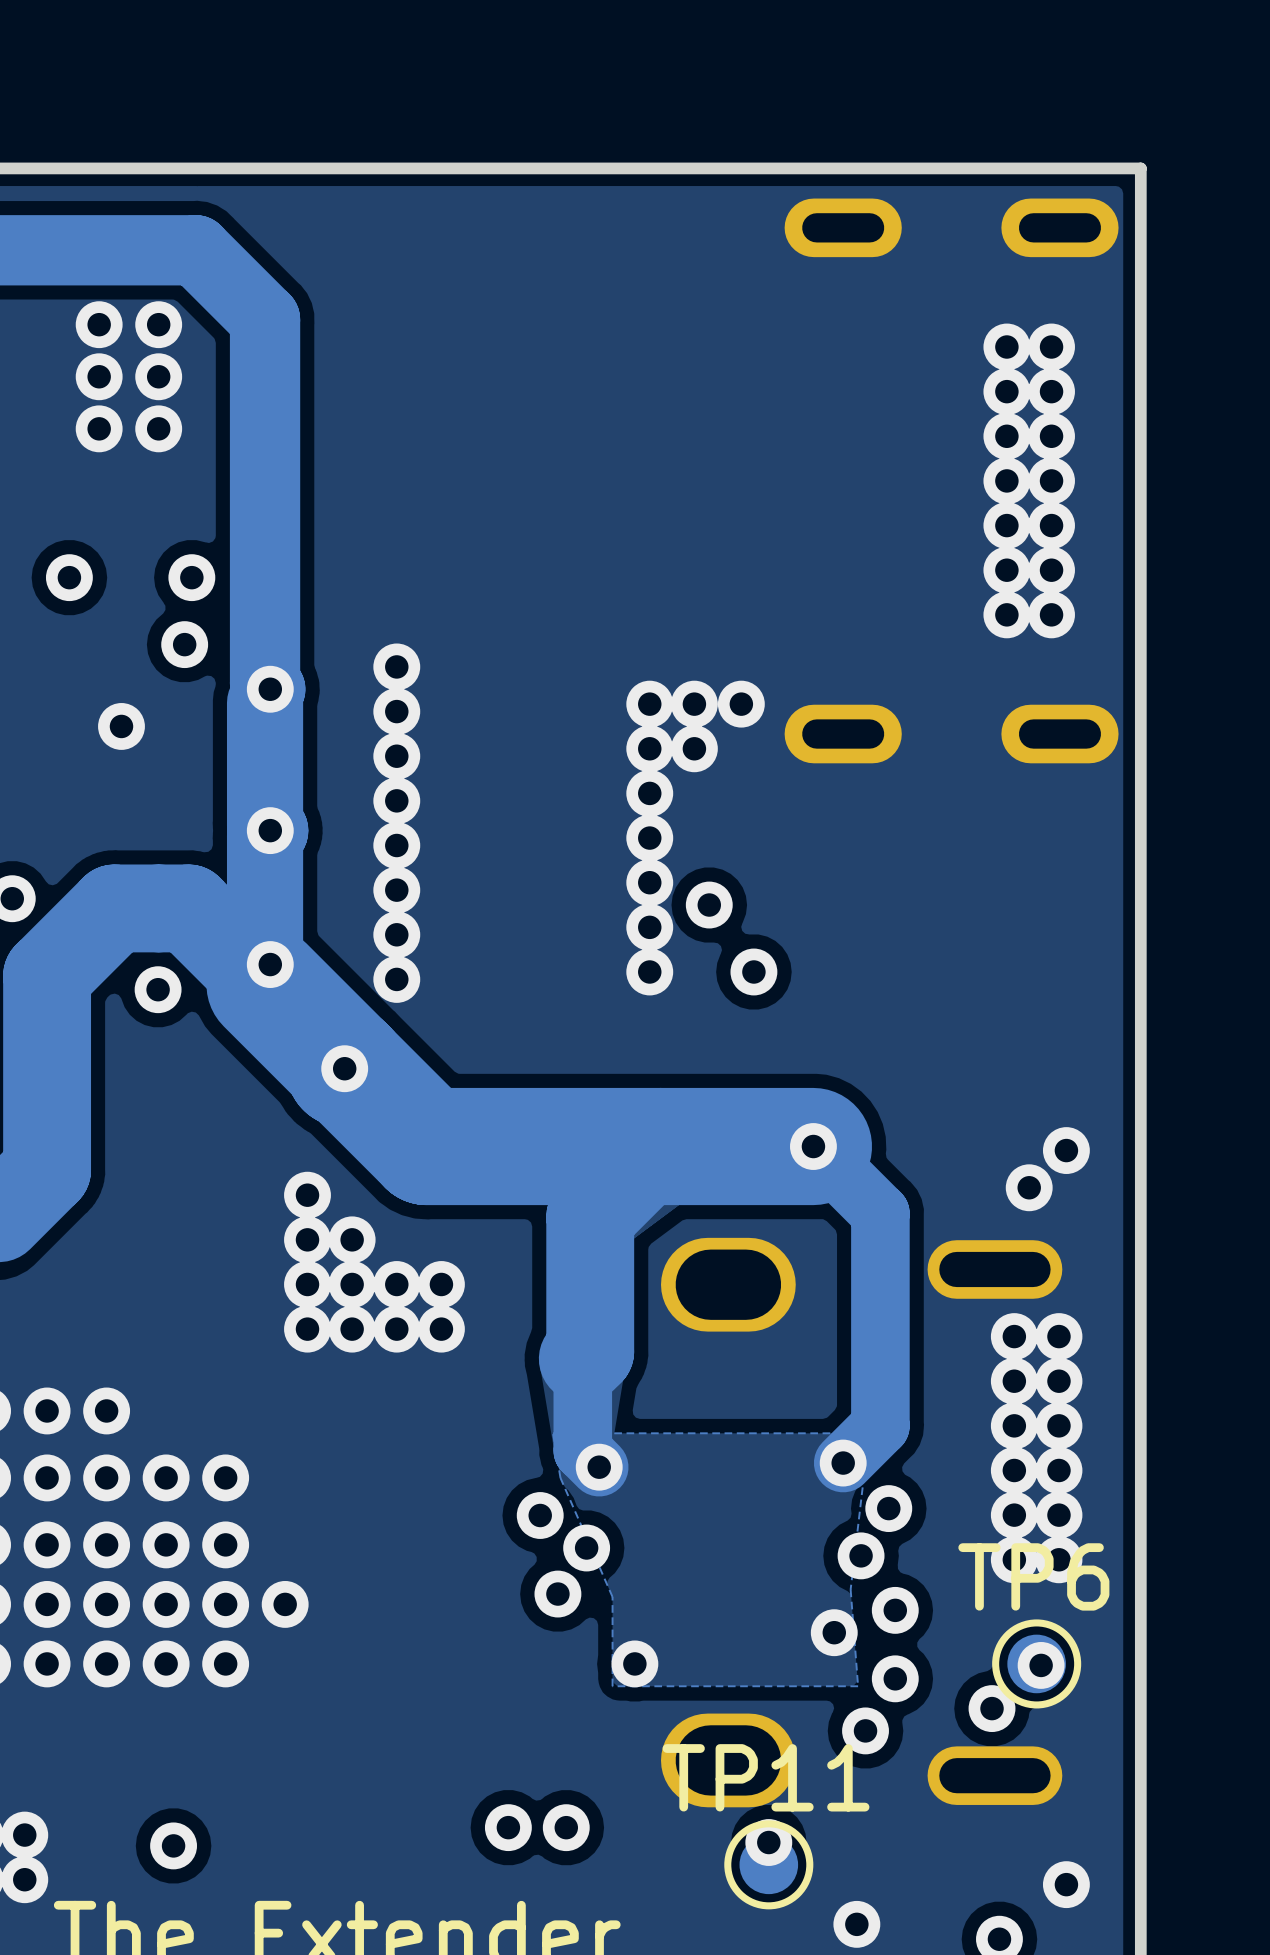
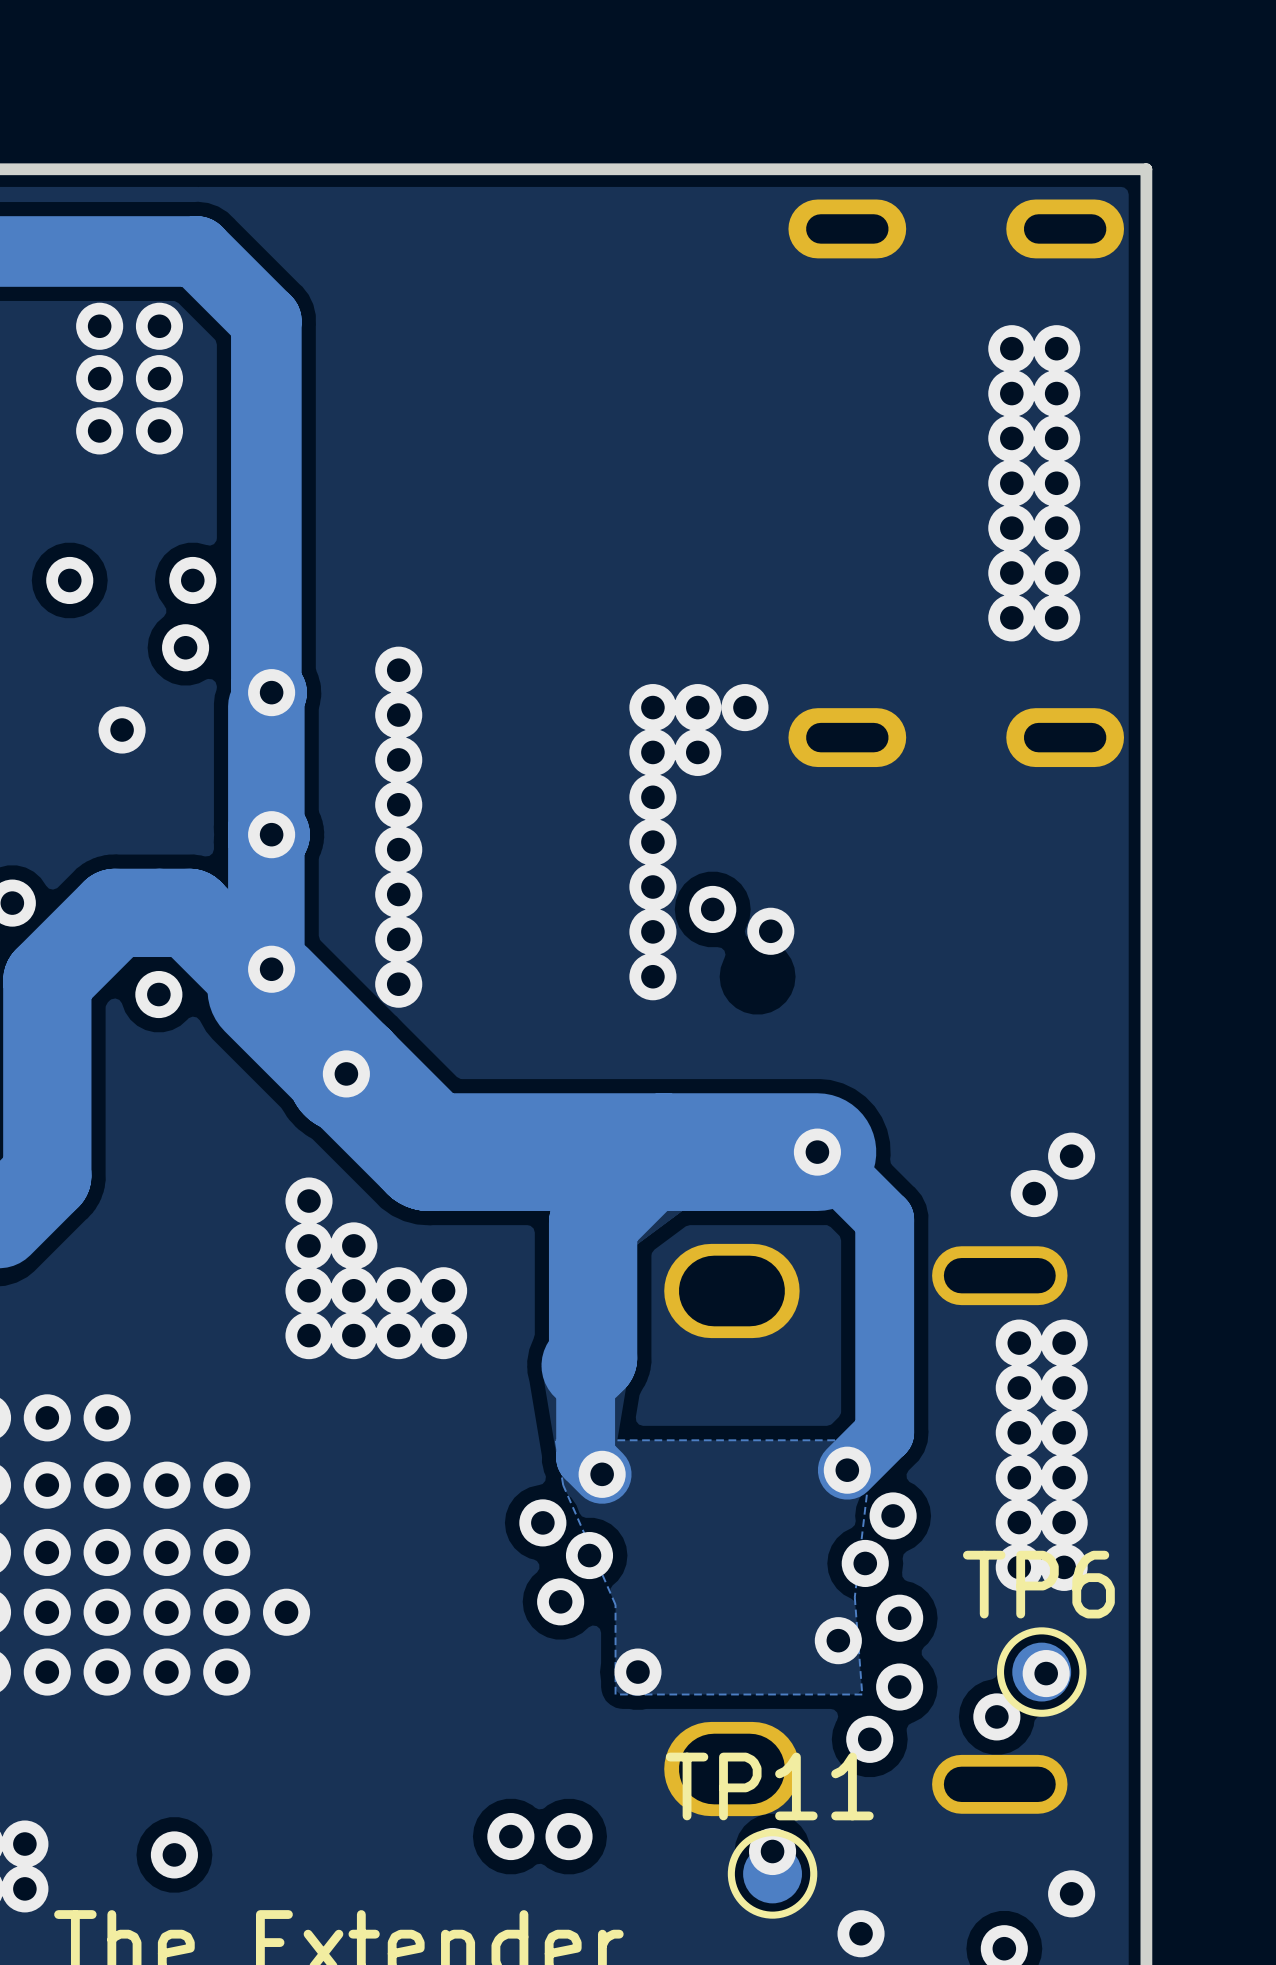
via position: (753, 971) -> (770, 931)

